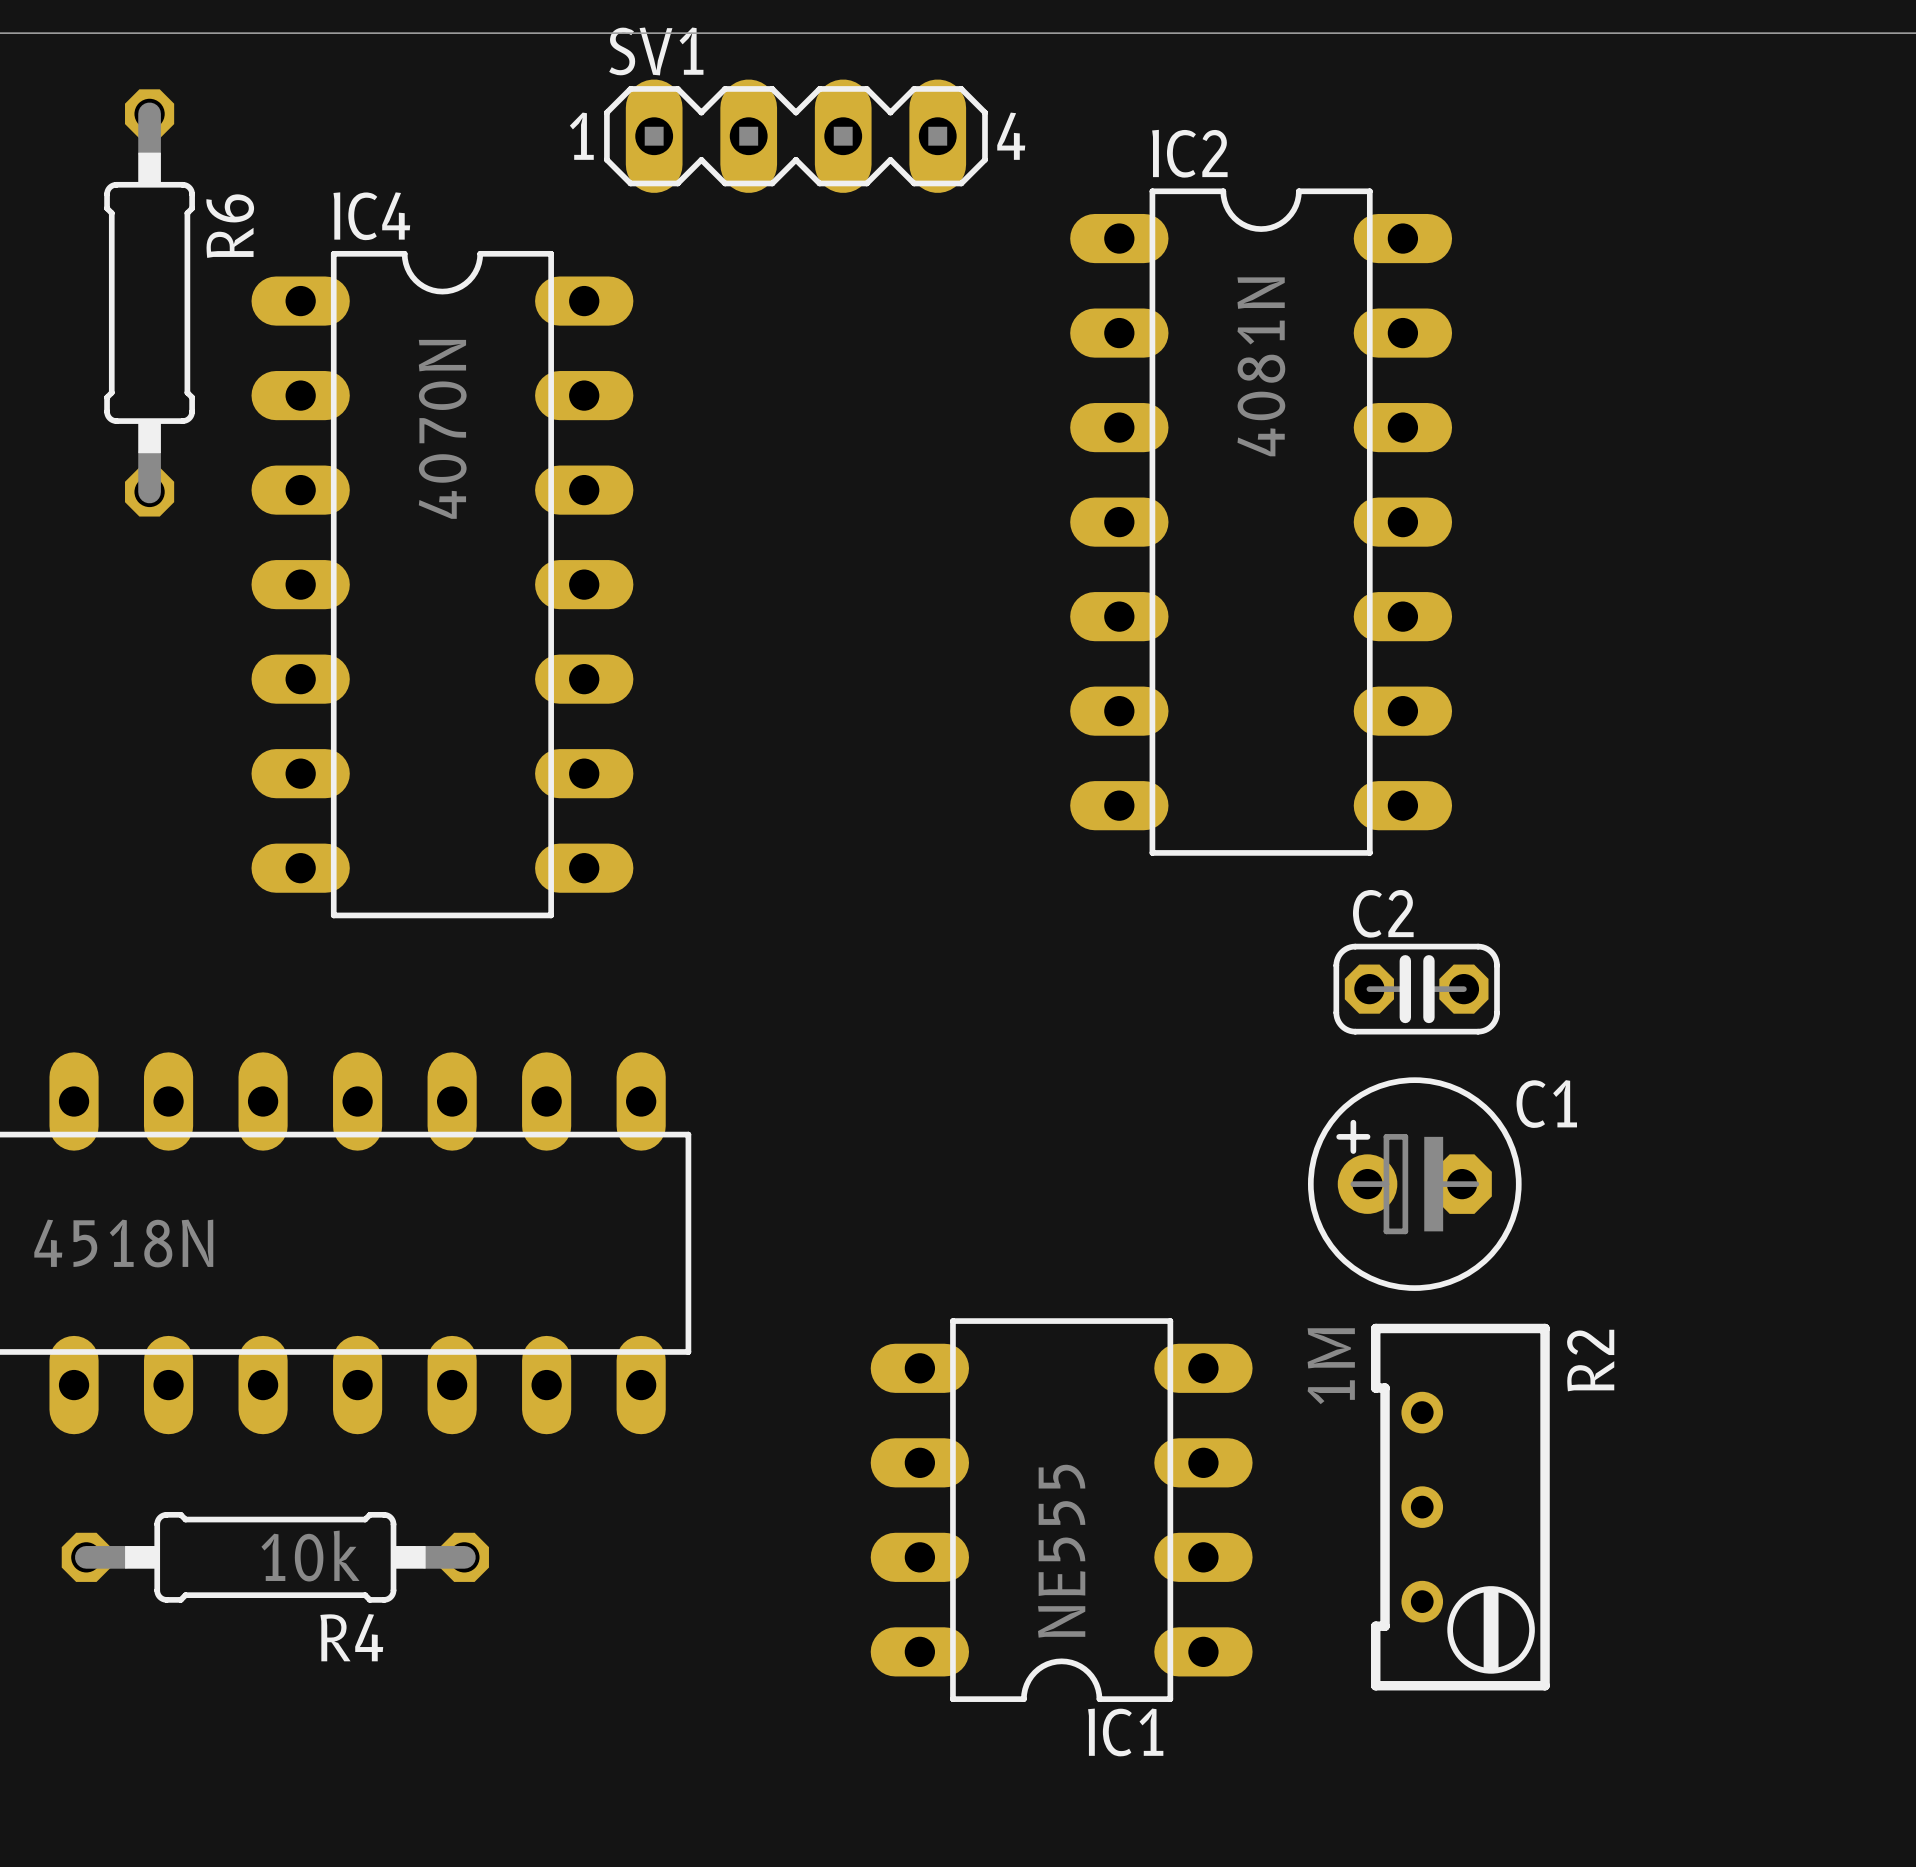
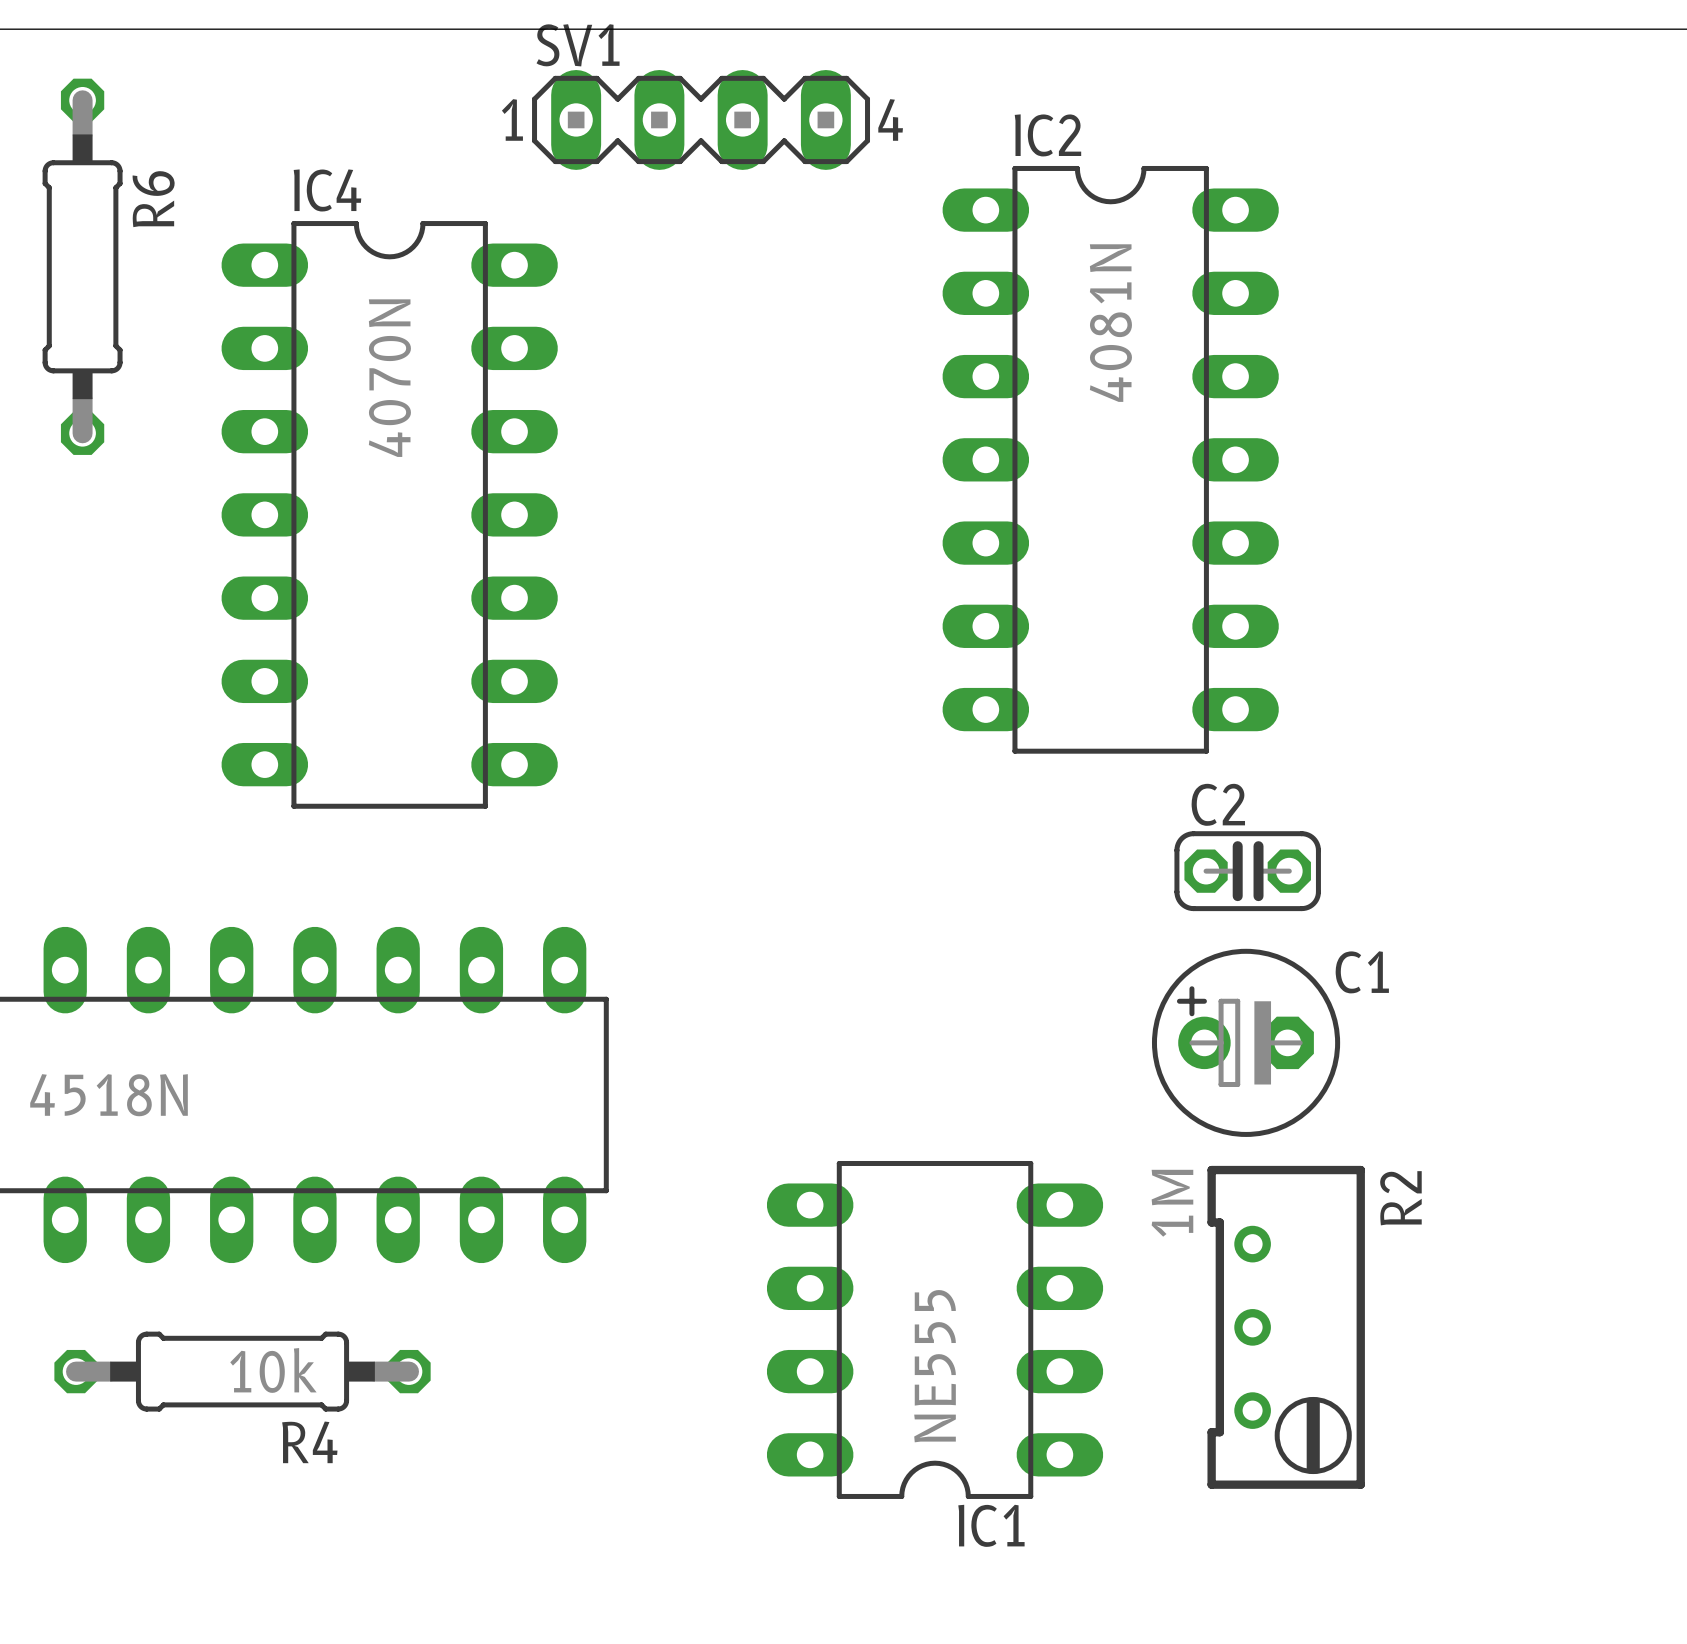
R6 position: (149, 302) -> (82, 266)

